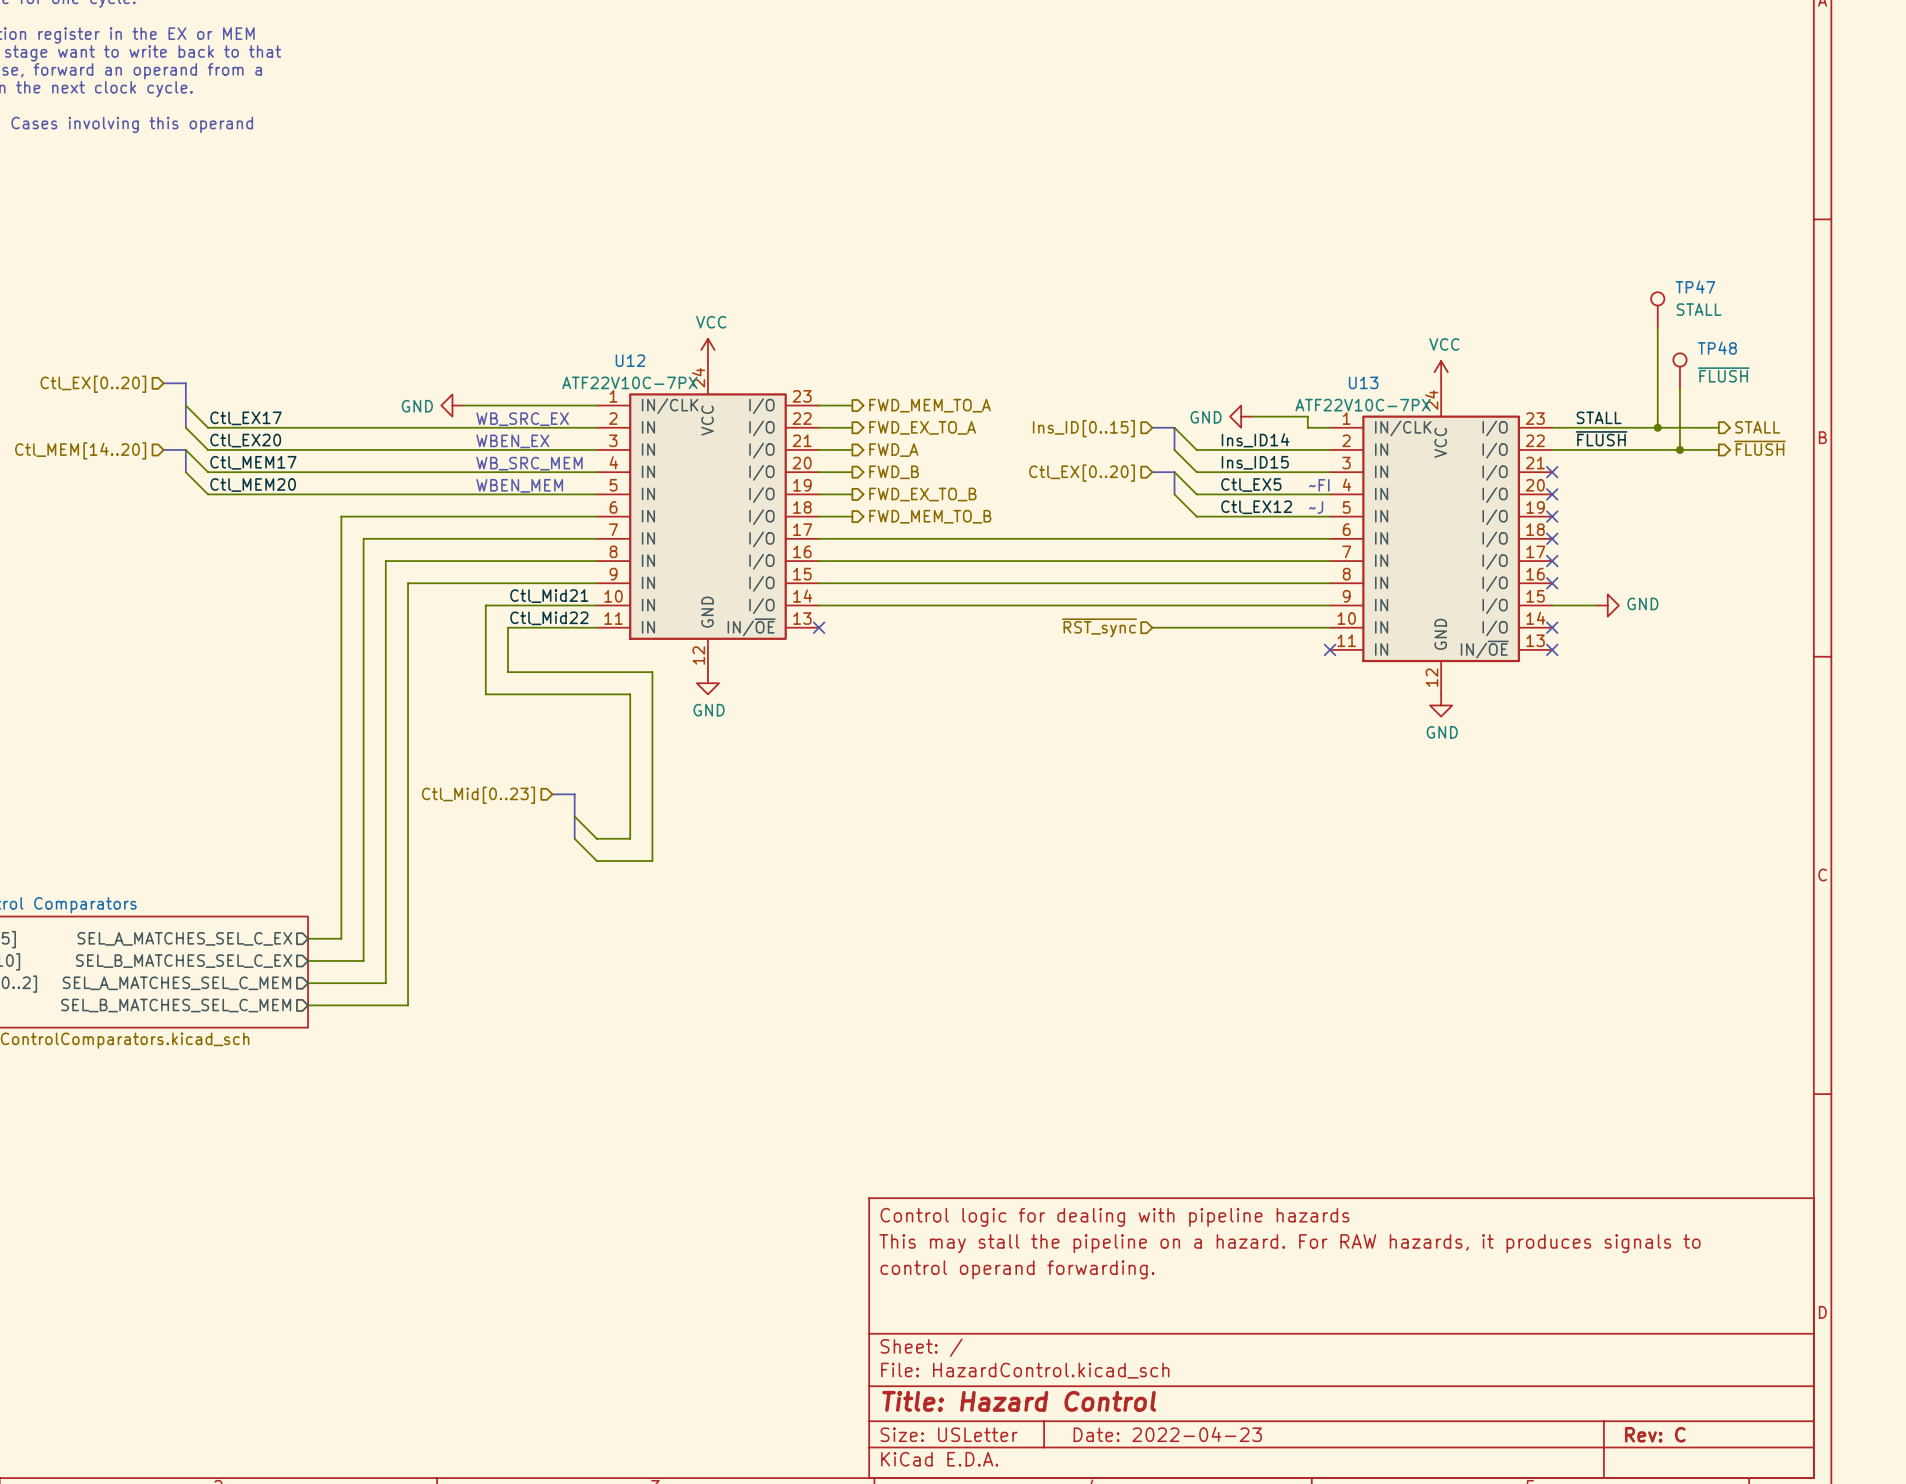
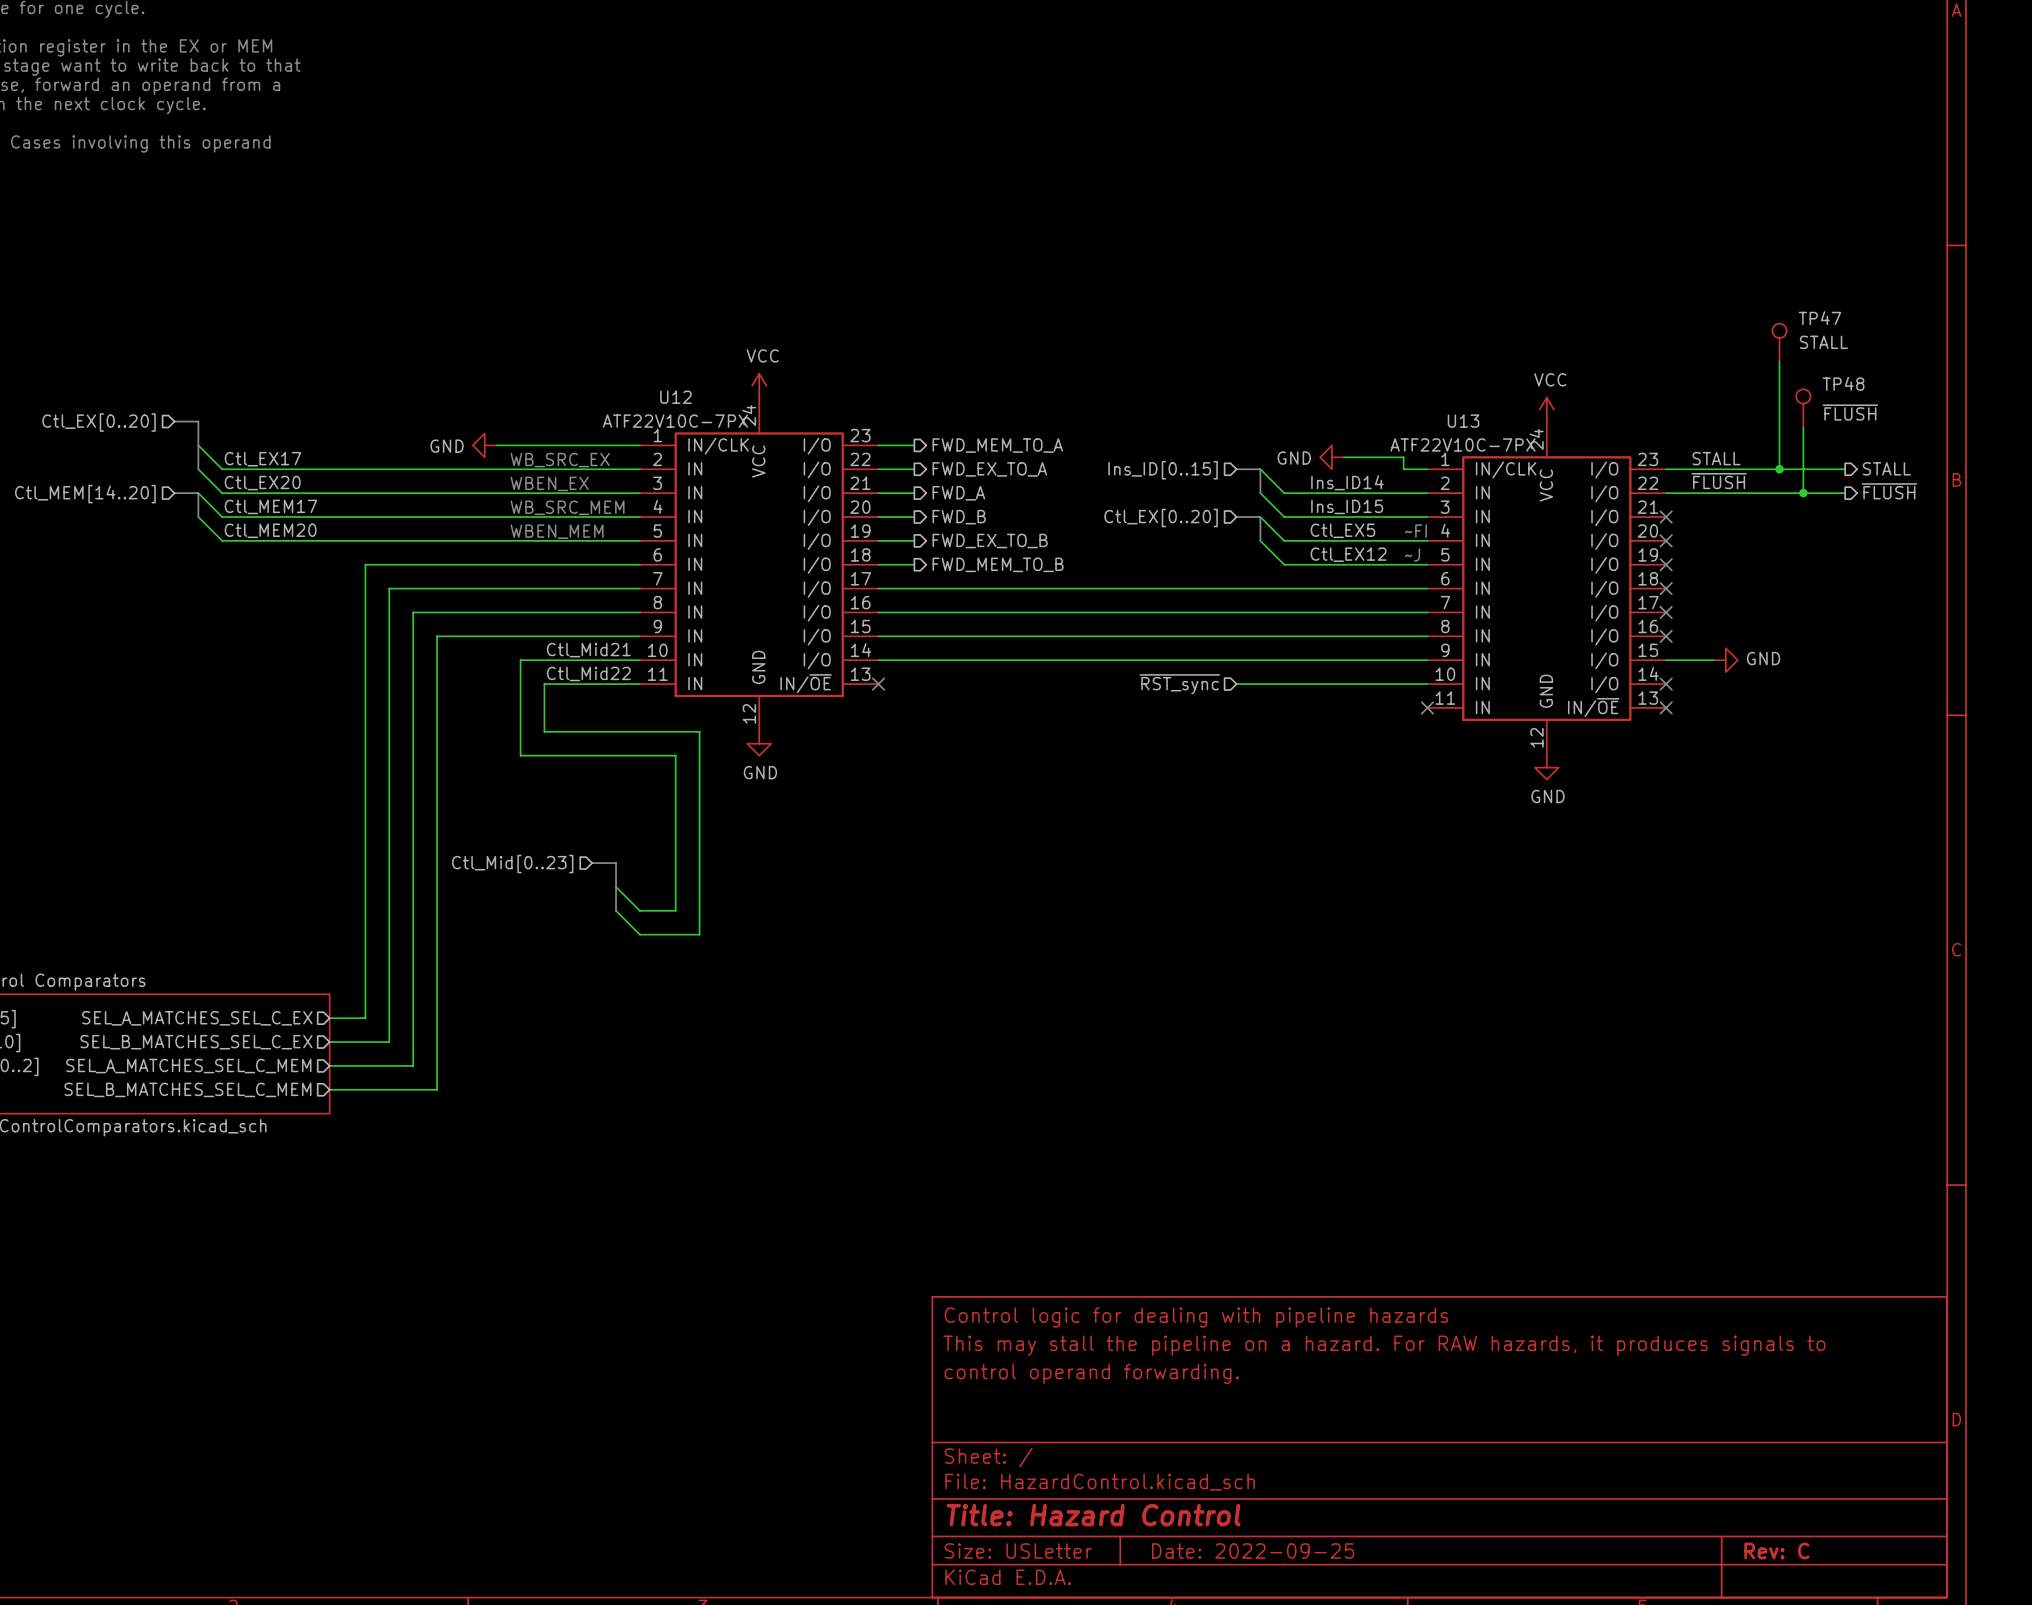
title block: Date: 2022-04-23 (1167, 1434) -> Date: 2022-09-25 (1253, 1550)

